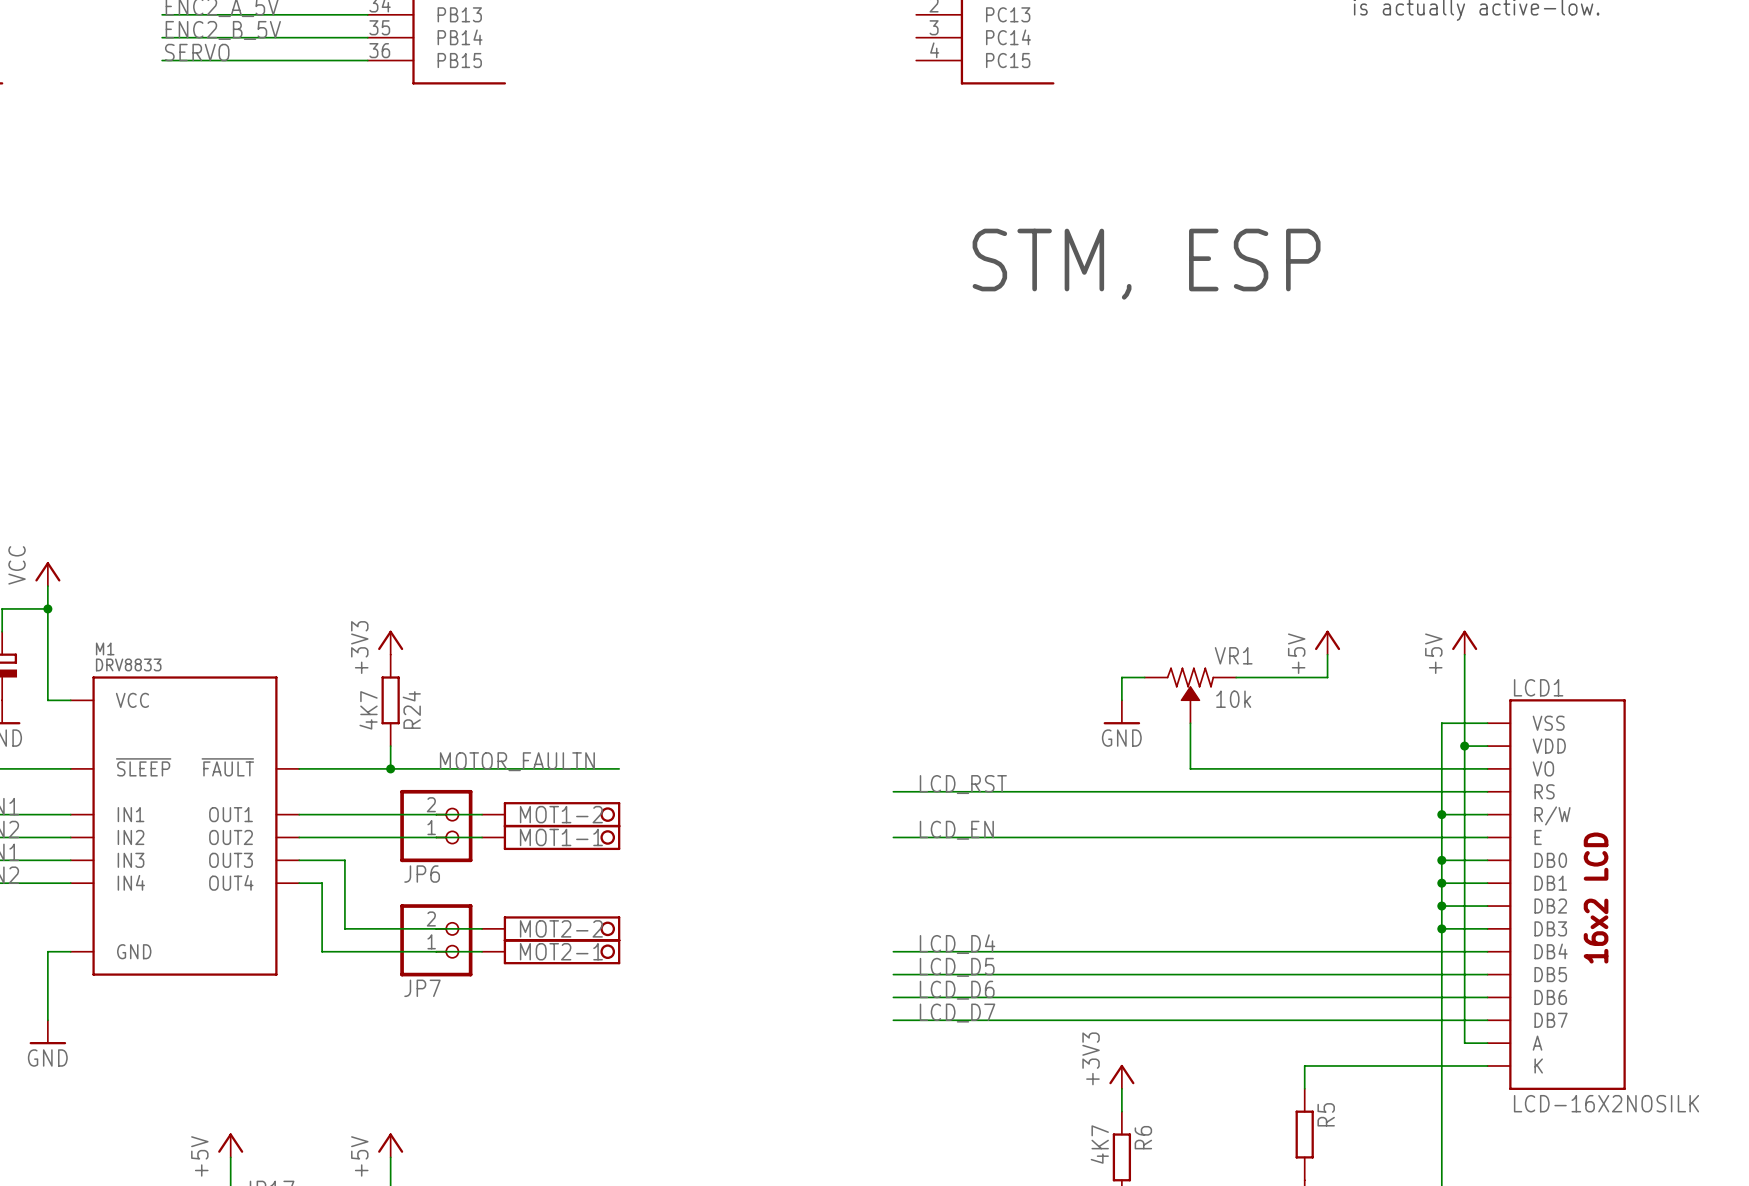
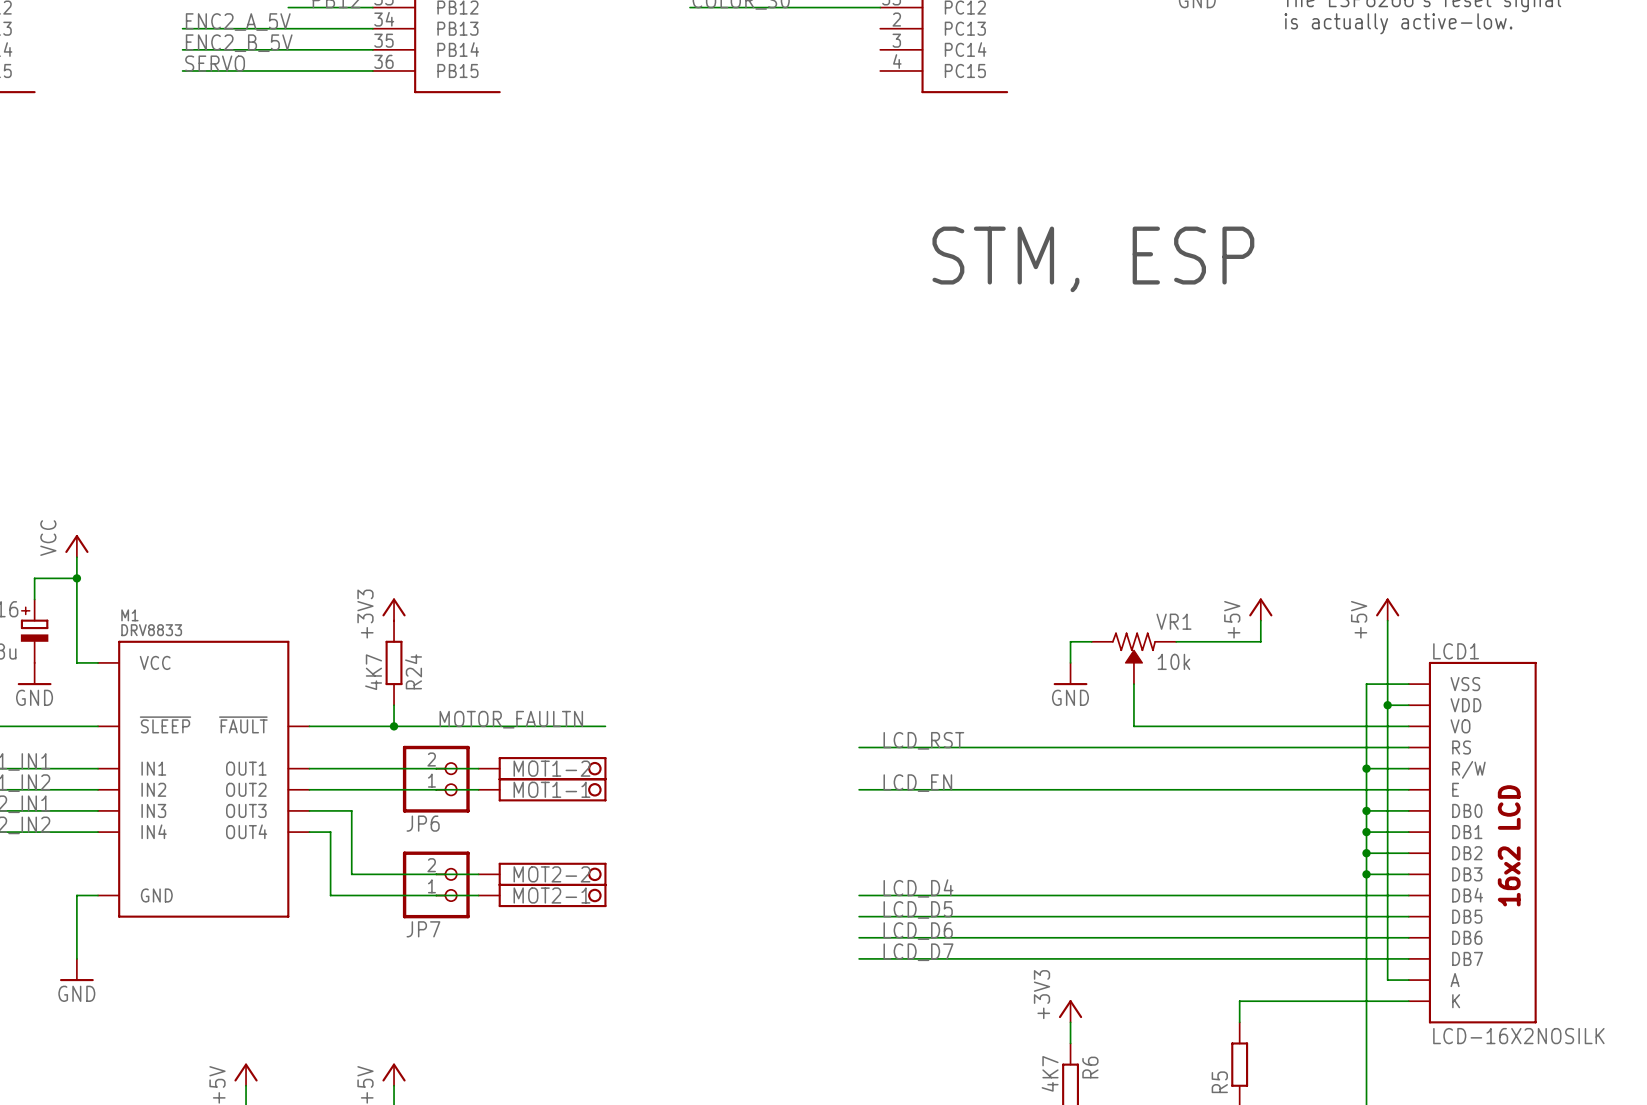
R5 name position: R5 (1326, 1114) -> R5 (1219, 1082)

